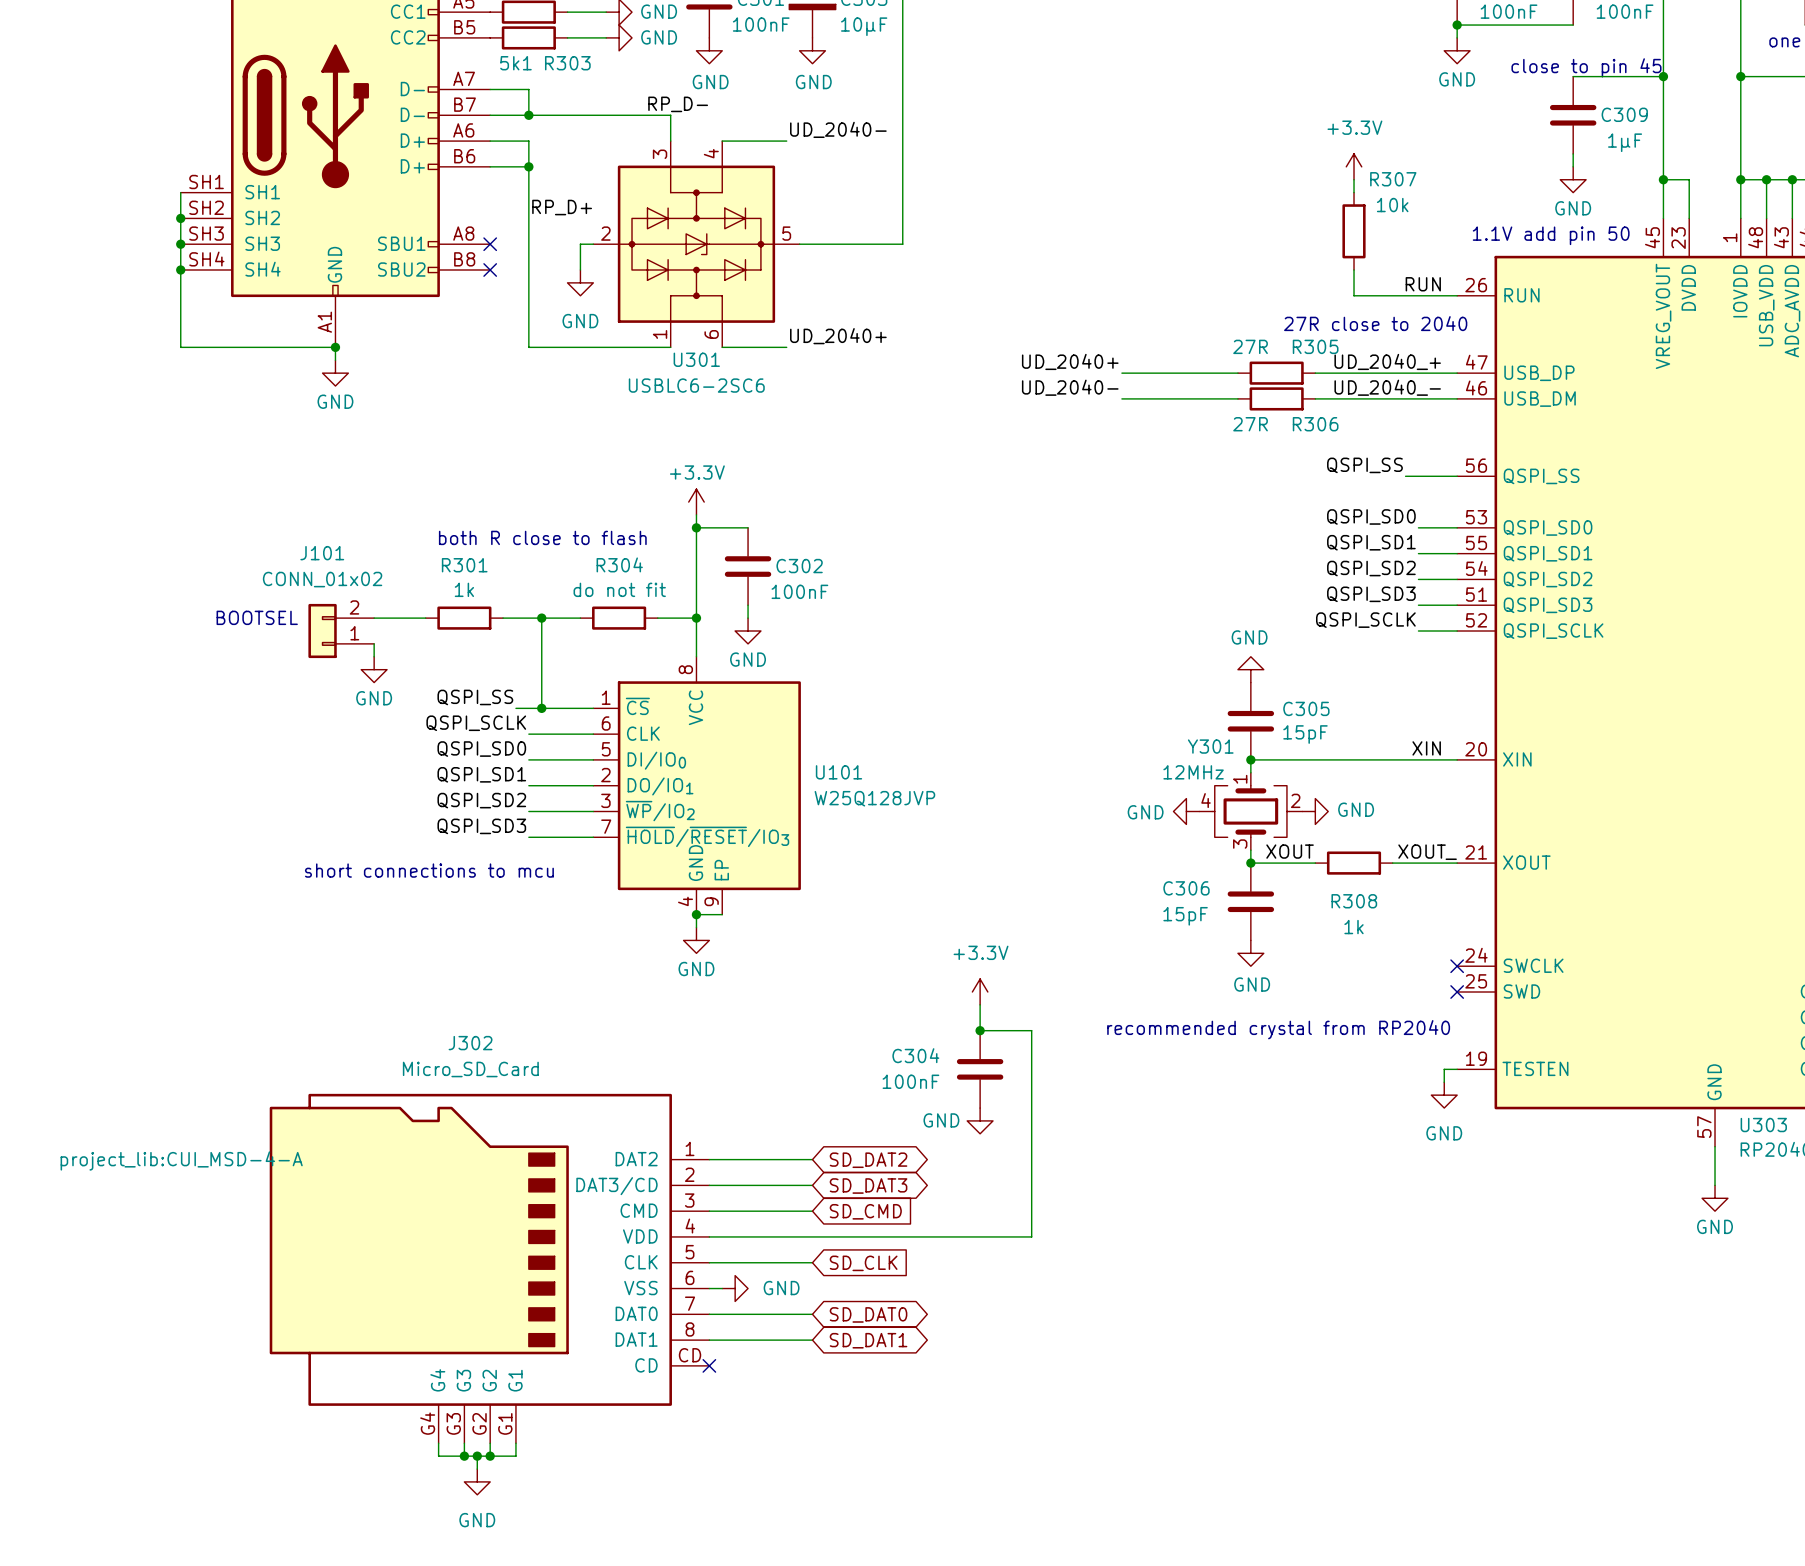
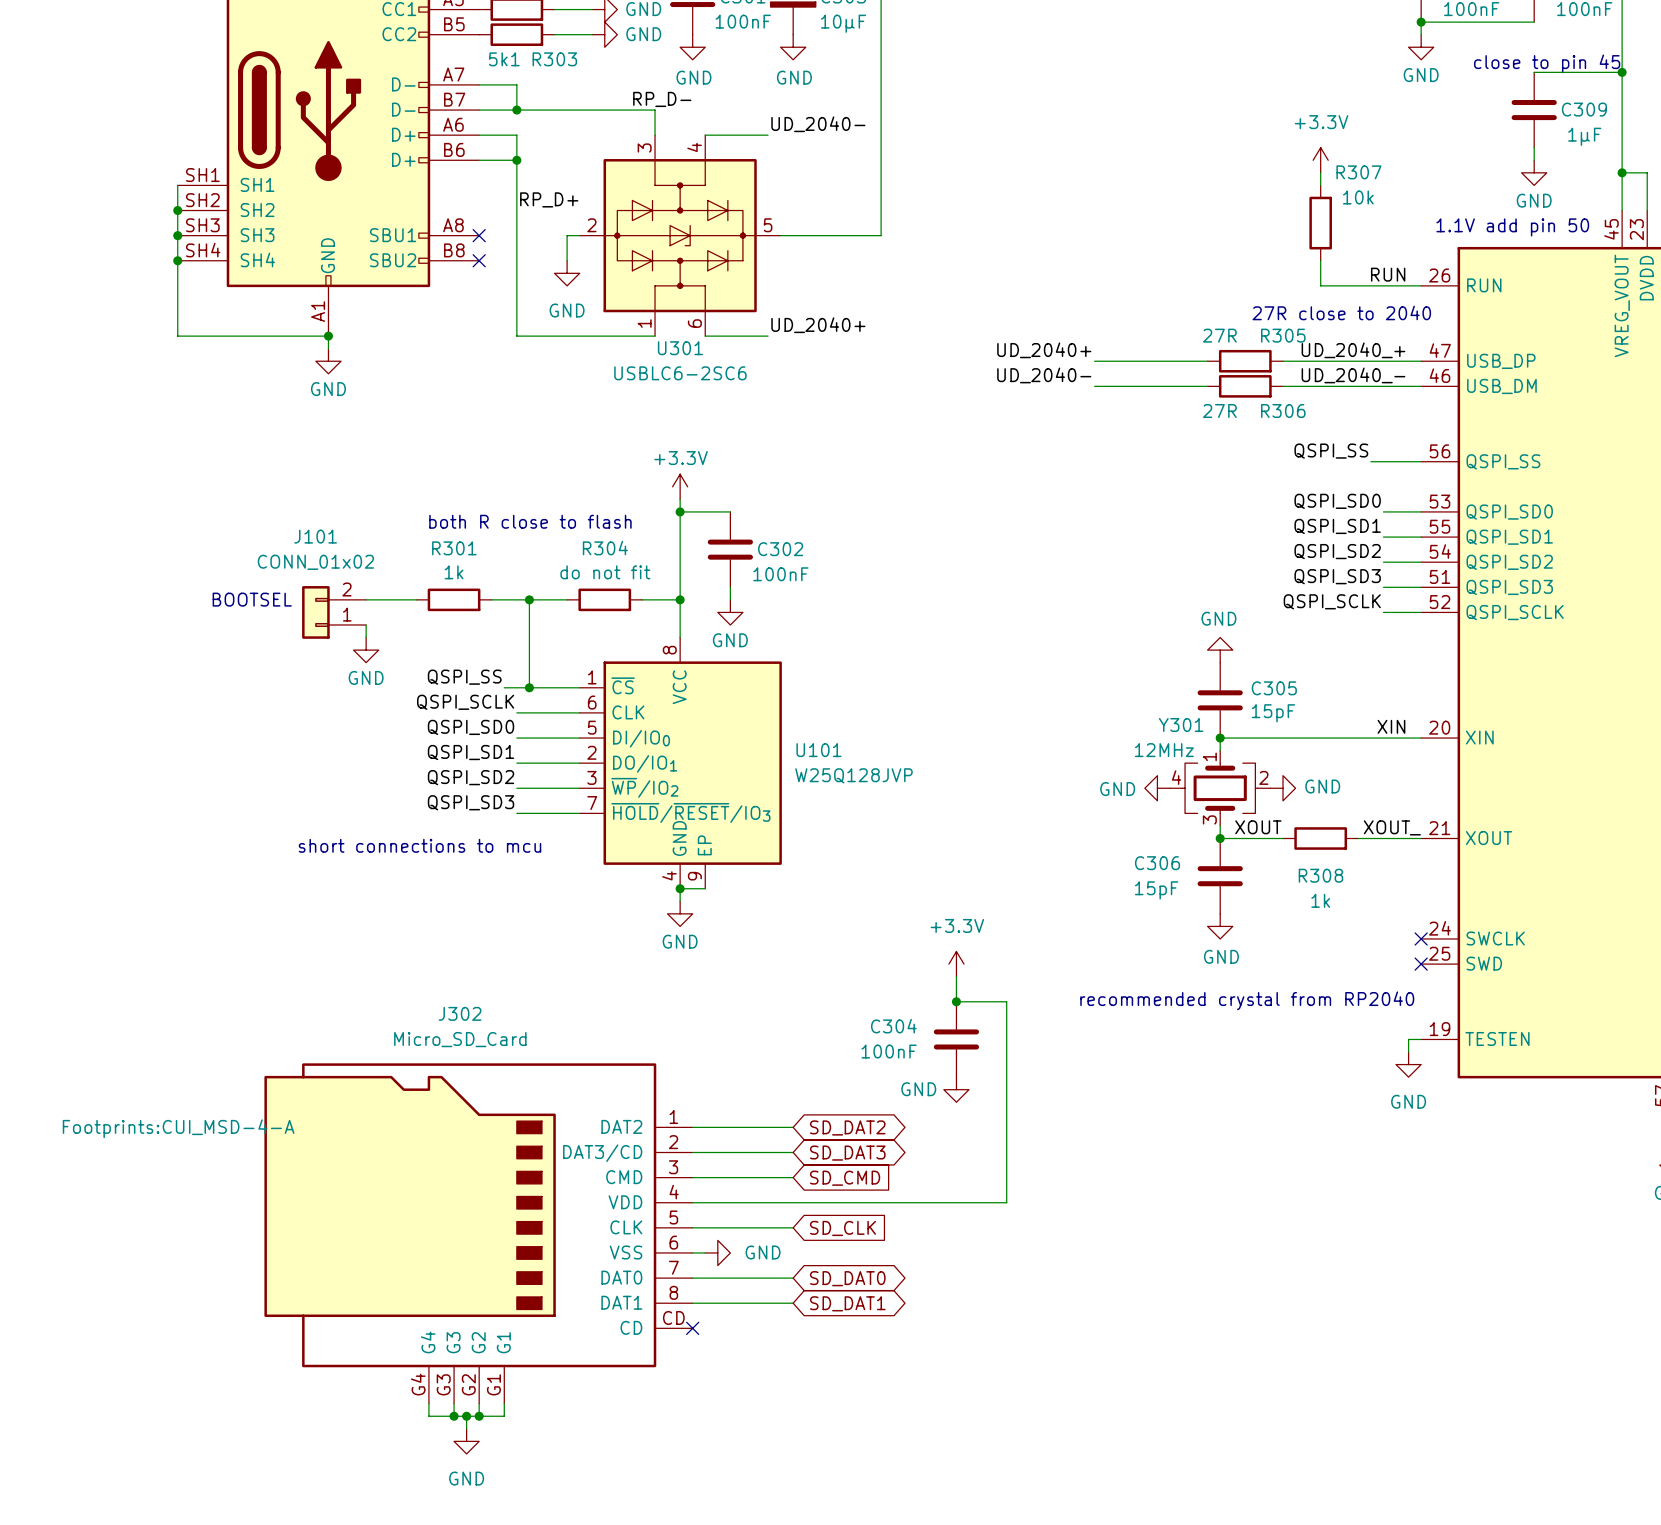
J302 text: project_lib:CUI_MSD-4-A (181, 1160) -> Footprints:CUI_MSD-4-A (178, 1128)

